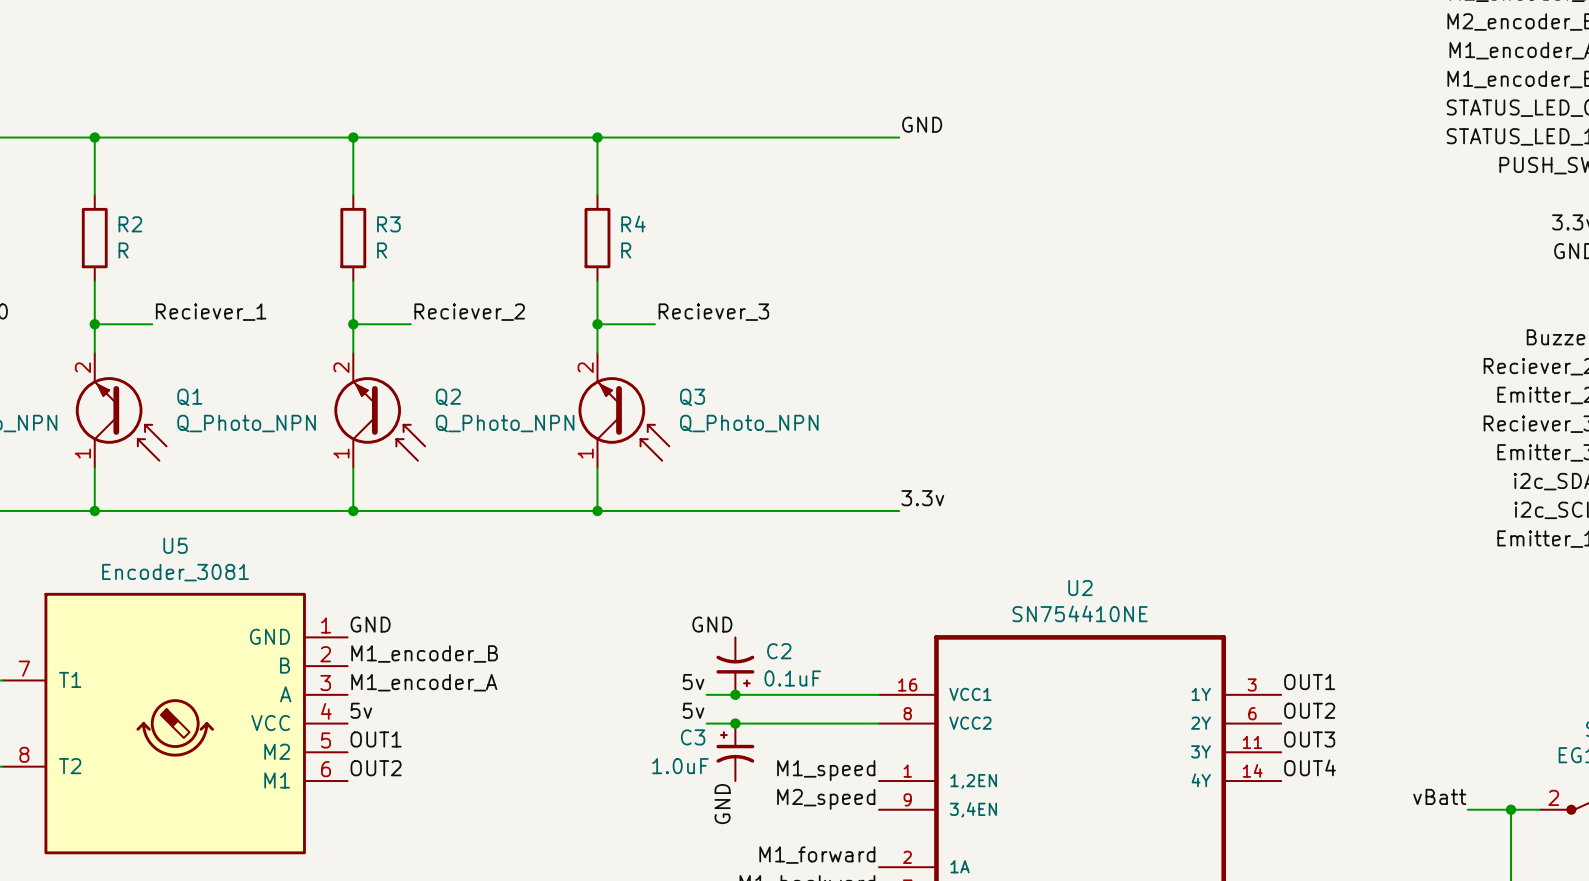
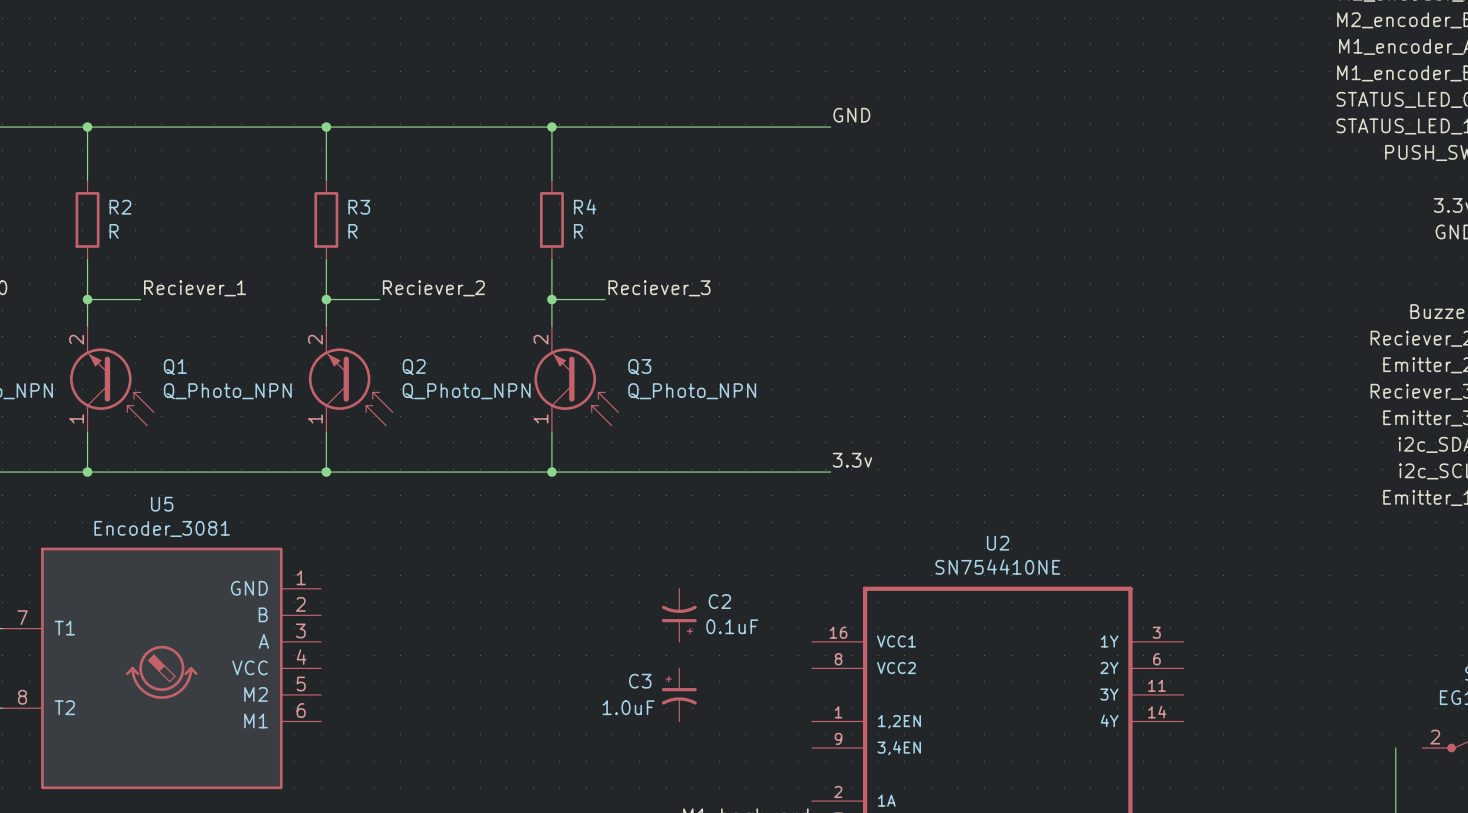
label: GND (370, 624) -> none
label: GND (712, 624) -> none
label: M1_encoder_B (424, 653) -> none
label: M1_encoder_A (424, 682) -> none
label: 5v (693, 682) -> none
label: OUT1 (1309, 682) -> none
wire: (706, 694) (879, 694) -> none
junction: (735, 694) -> none
label: 5v (361, 710) -> none
label: 5v (693, 710) -> none
label: OUT2 (1309, 710) -> none
wire: (706, 723) (879, 723) -> none
junction: (735, 723) -> none
label: OUT1 (376, 739) -> none
label: OUT3 (1309, 739) -> none
label: OUT4 (1310, 767) -> none
label: OUT2 (376, 768) -> none
label: M1_speed (826, 770) -> none
label: vBatt (1439, 796) -> none
label: M2_speed (826, 799) -> none
label: GND (722, 804) -> none
wire: (1467, 809) (1539, 809) -> none
junction: (1511, 809) -> none
label: M1_forward (817, 855) -> none

